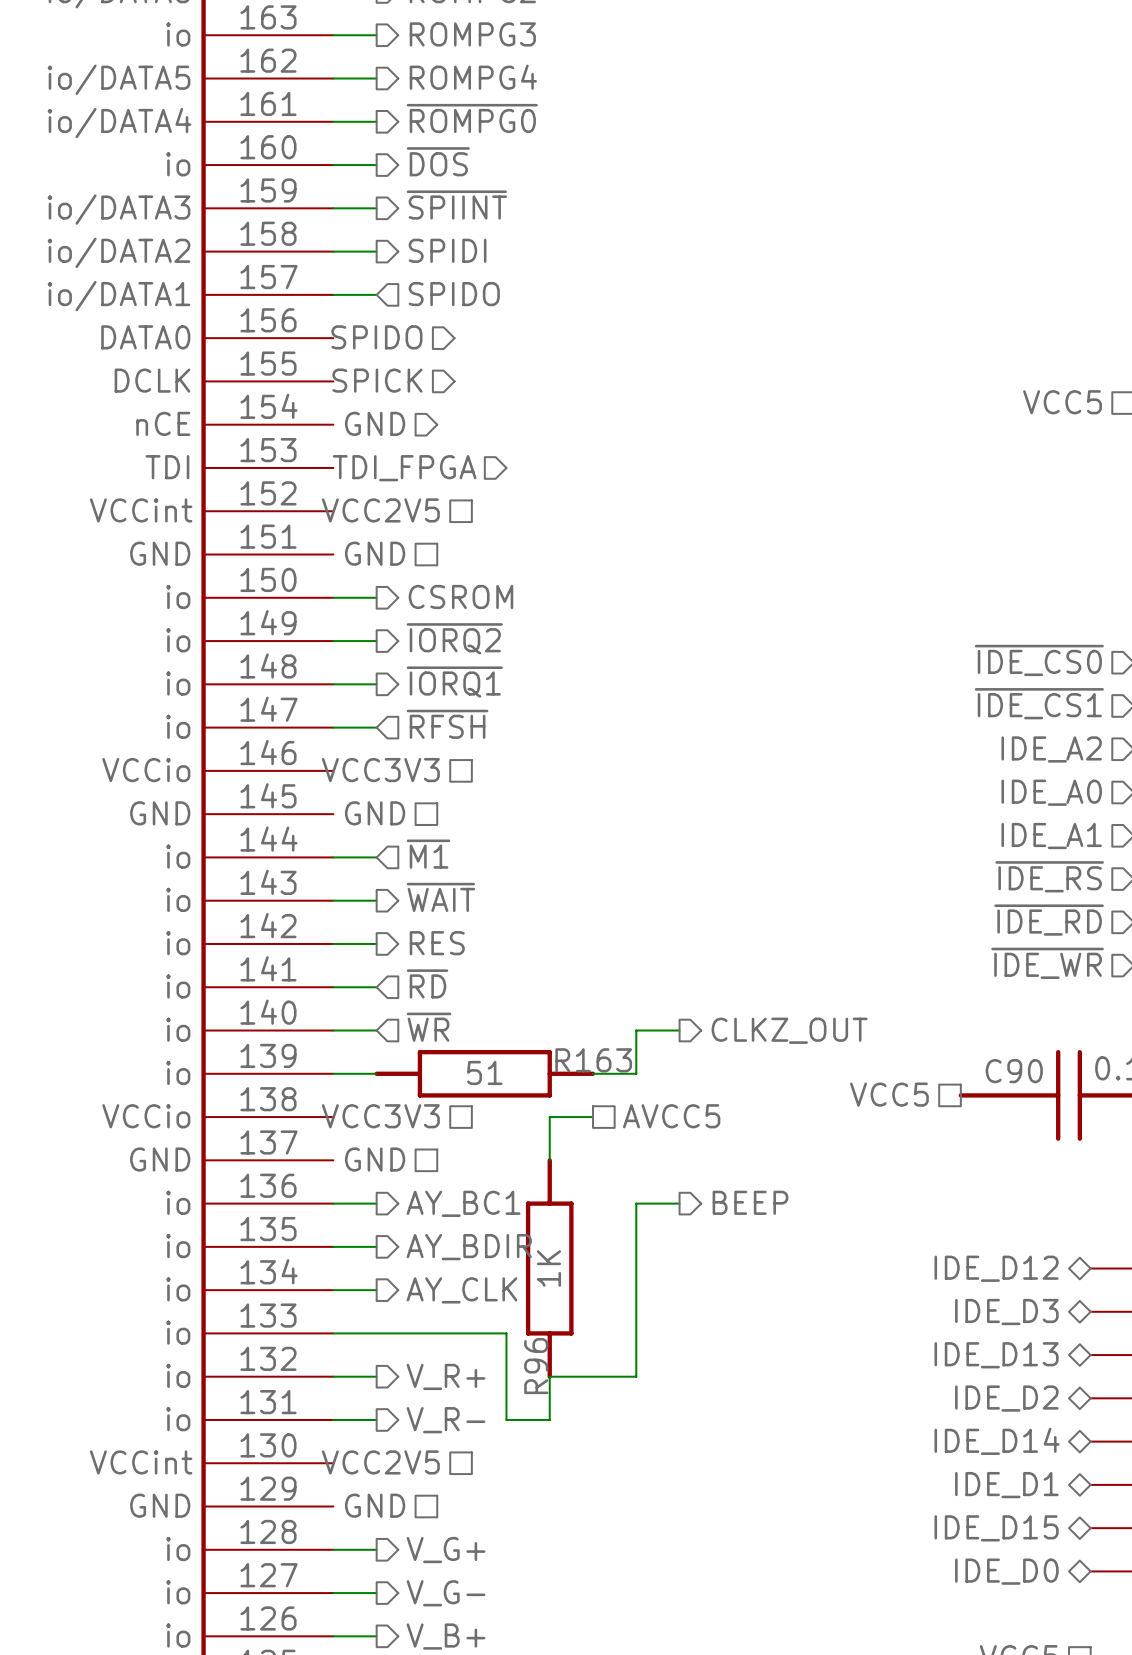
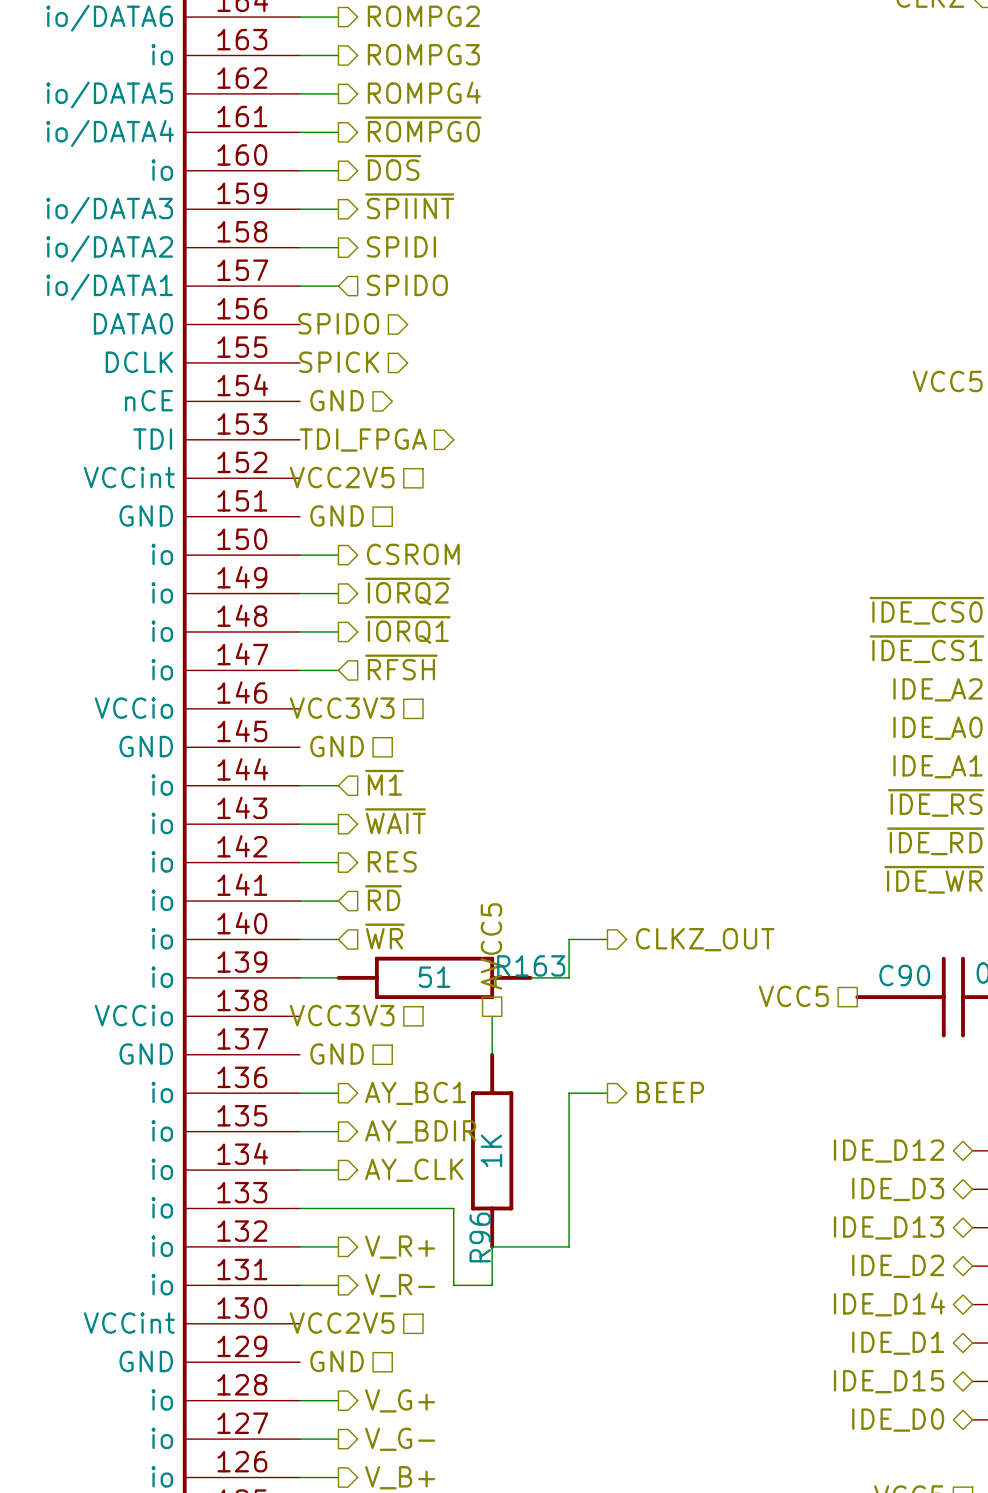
hierarchical label rotation: 0° (671, 1116) -> 90° counterclockwise (491, 946)
hierarchical label position: AVCC5 (671, 1116) -> AVCC5 (491, 946)
wire: (549, 1117) (593, 1117) -> none

